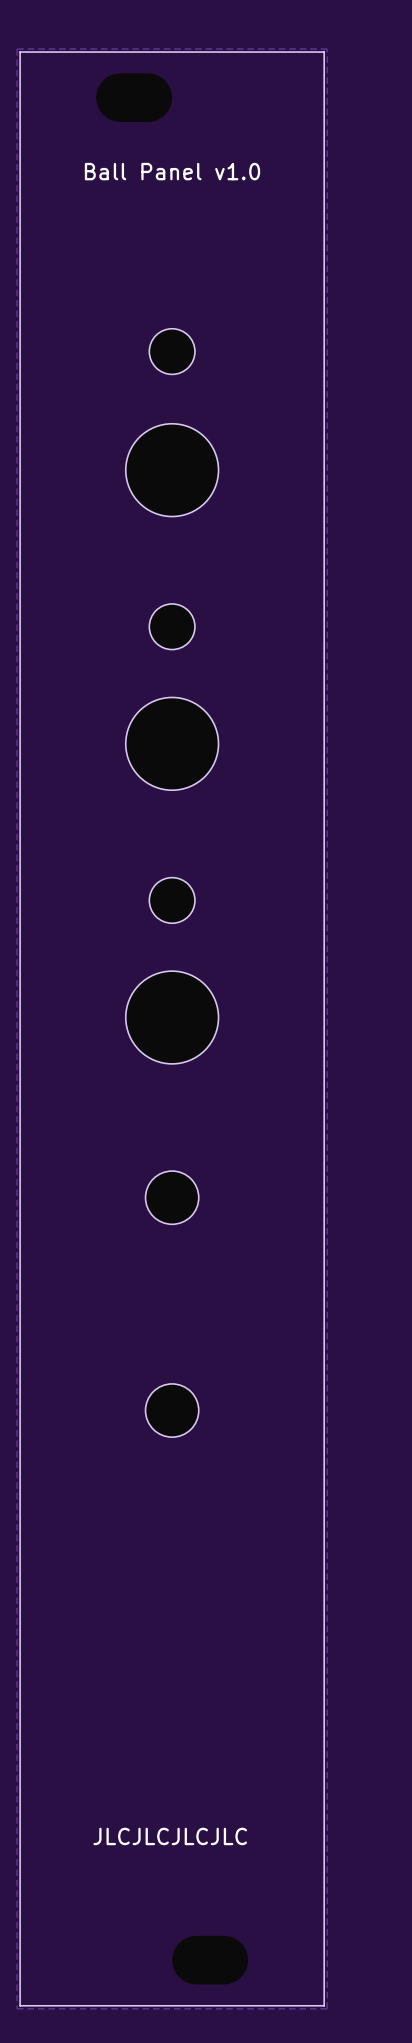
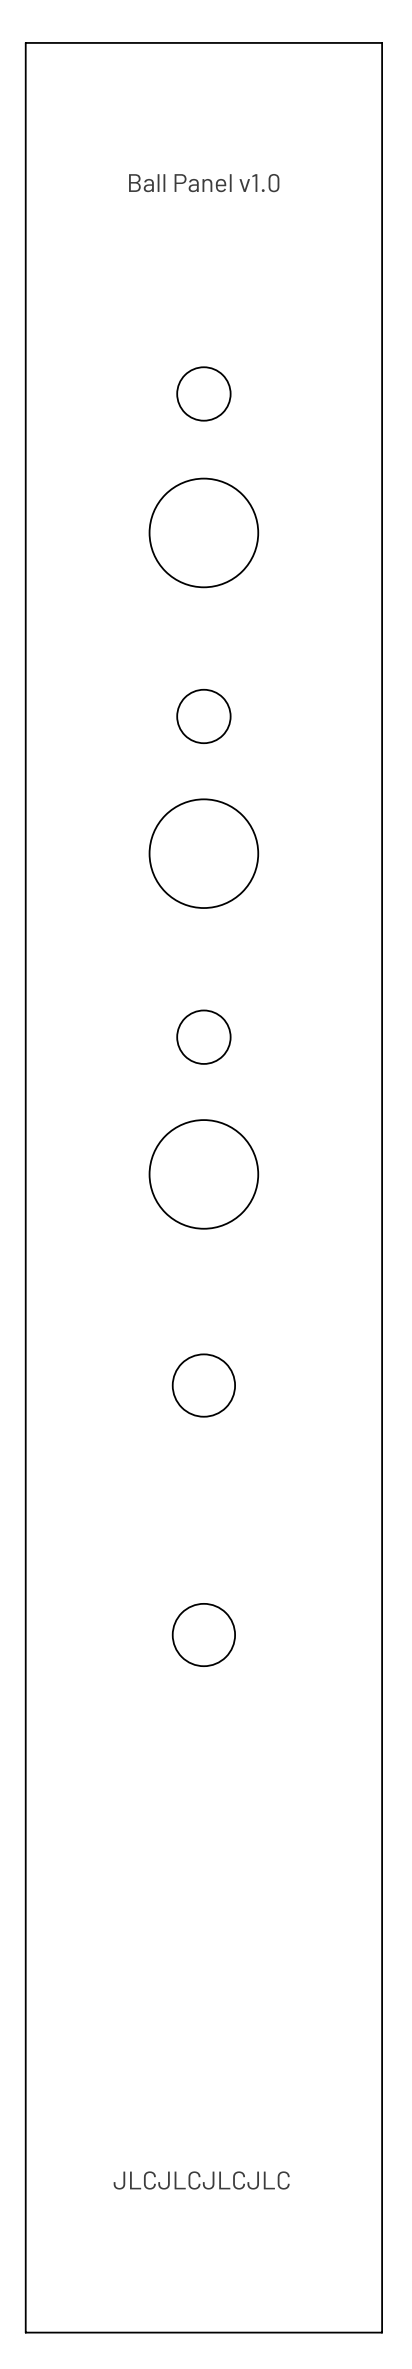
zone outline: (327, 49) (327, 2008) (17, 2008) (17, 49) (327, 49) -> none
text position: JLCJLCJLCJLC (170, 1836) -> JLCJLCJLCJLC (201, 2180)

